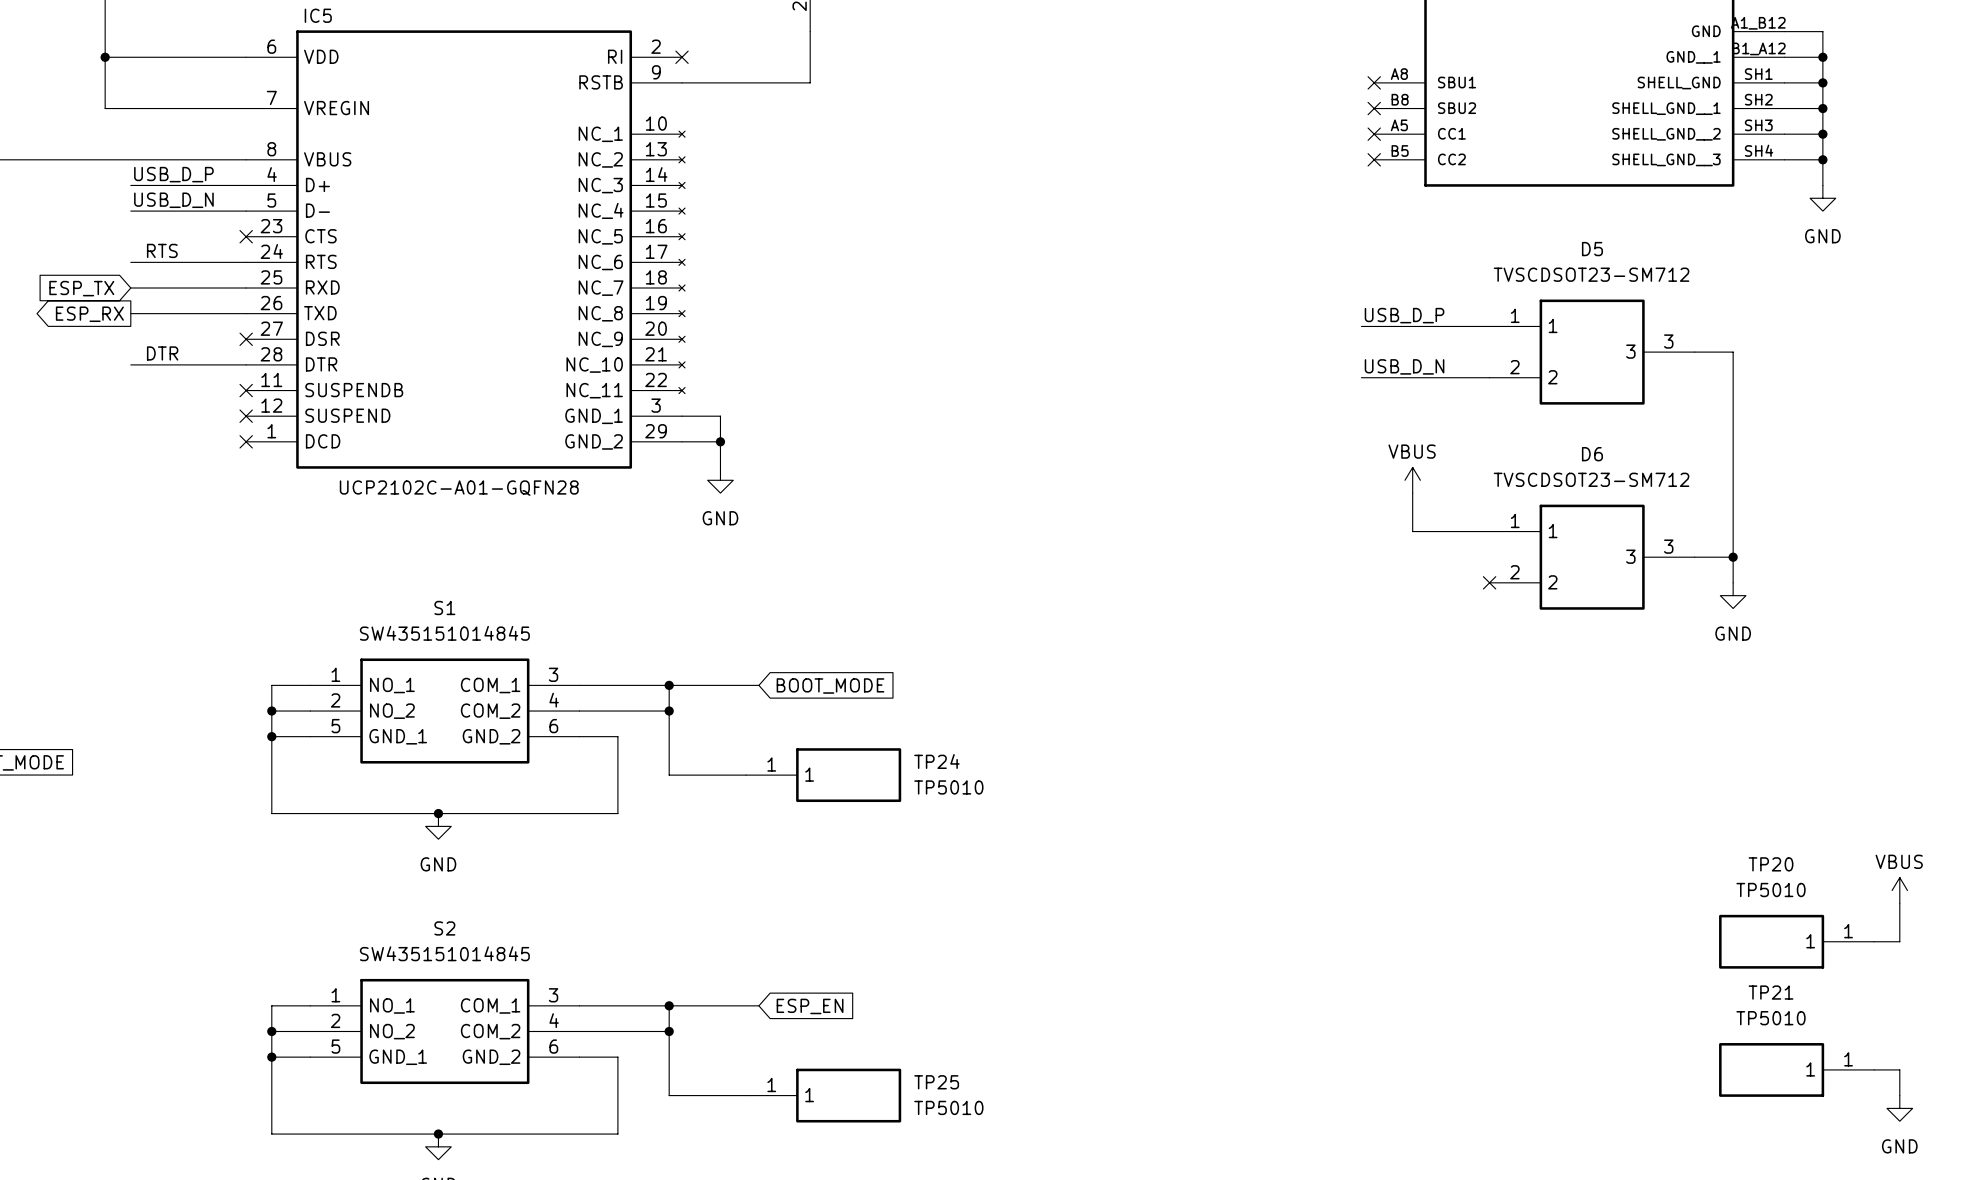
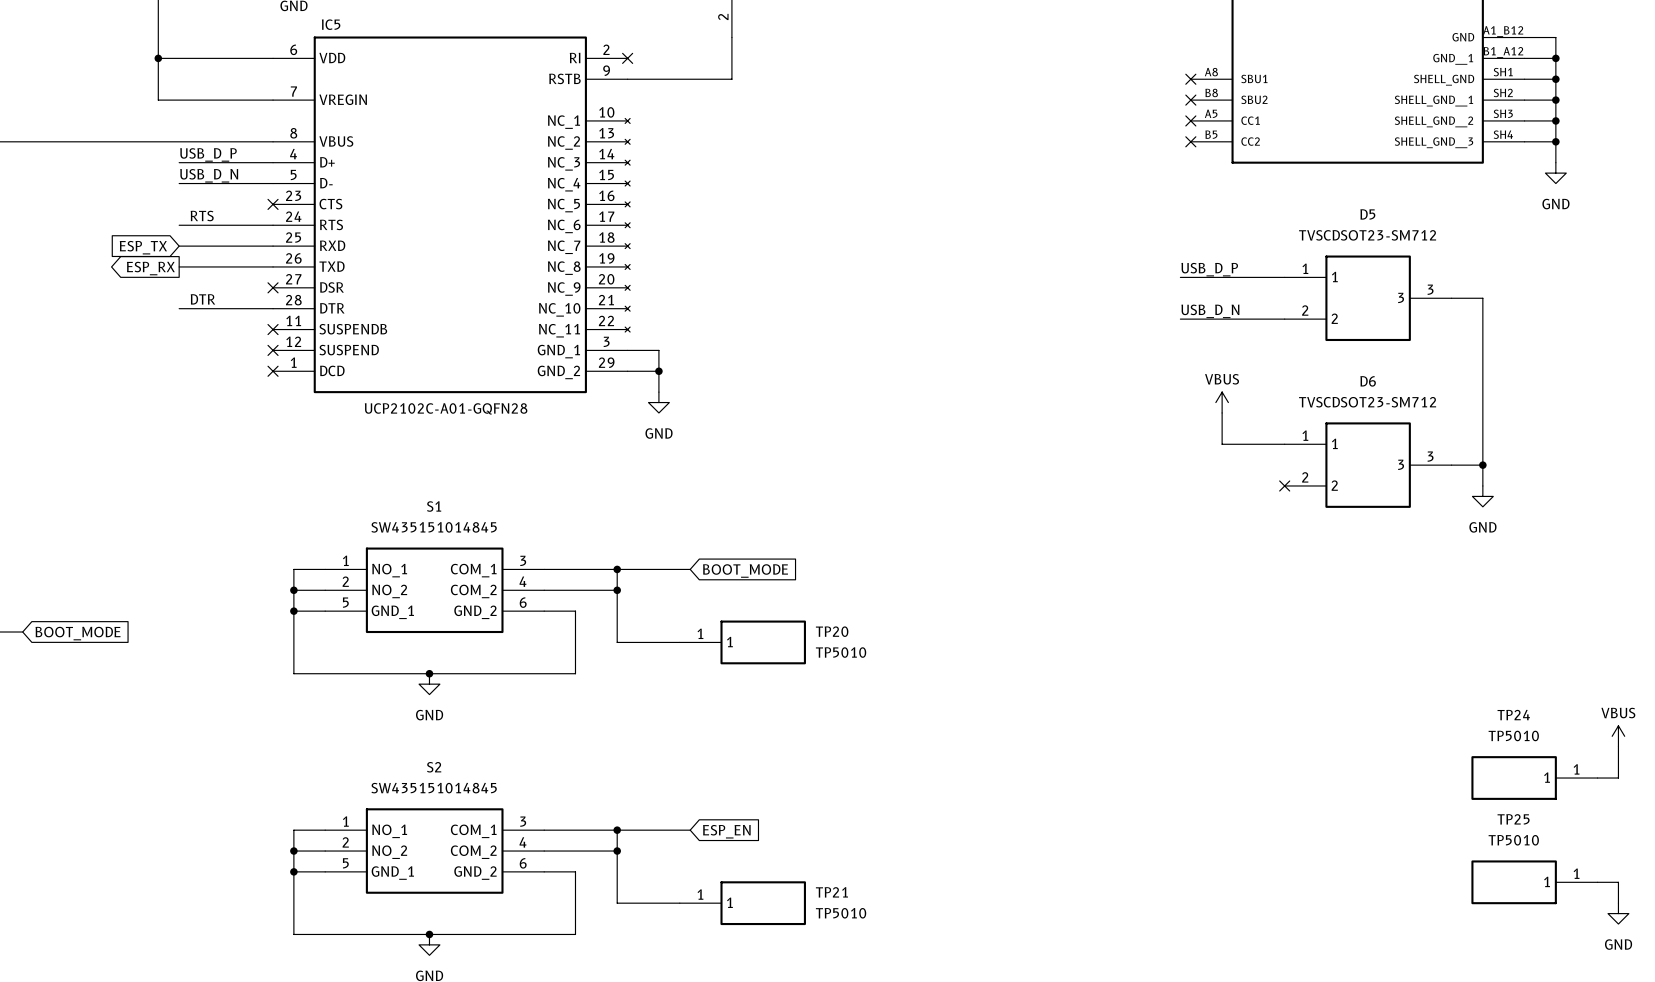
TP24 name: TP24 (936, 761) -> TP20 (832, 631)
TP20 name: TP20 (1771, 864) -> TP24 (1513, 715)
TP21 name: TP21 (1771, 992) -> TP25 (1513, 819)
TP25 name: TP25 (936, 1082) -> TP21 (831, 892)

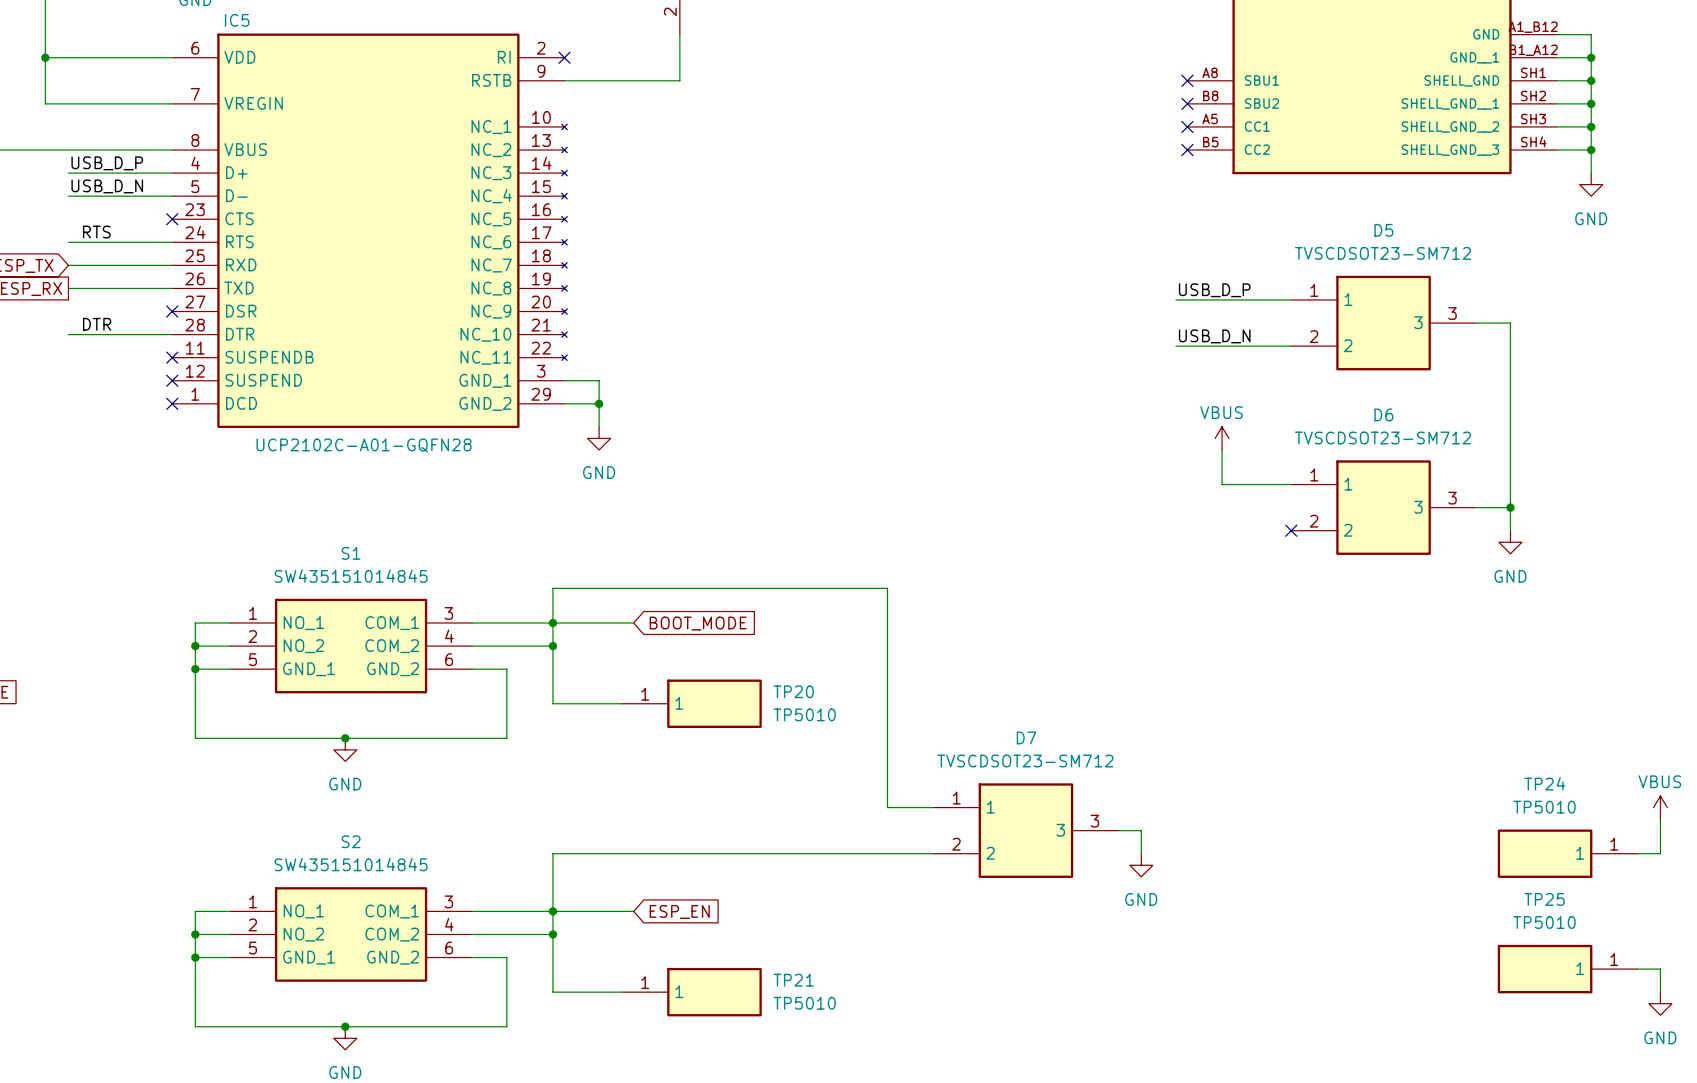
wire: none -> (552, 623) (552, 588) (887, 588) (887, 807) (933, 807)
D7: none -> TVSCDSOT23-SM712 (1025, 830)
wire: none -> (1118, 830) (1141, 830) (1141, 853)
wire: none -> (933, 853) (552, 853) (552, 911)
power symbol: none -> GND (1141, 865)

